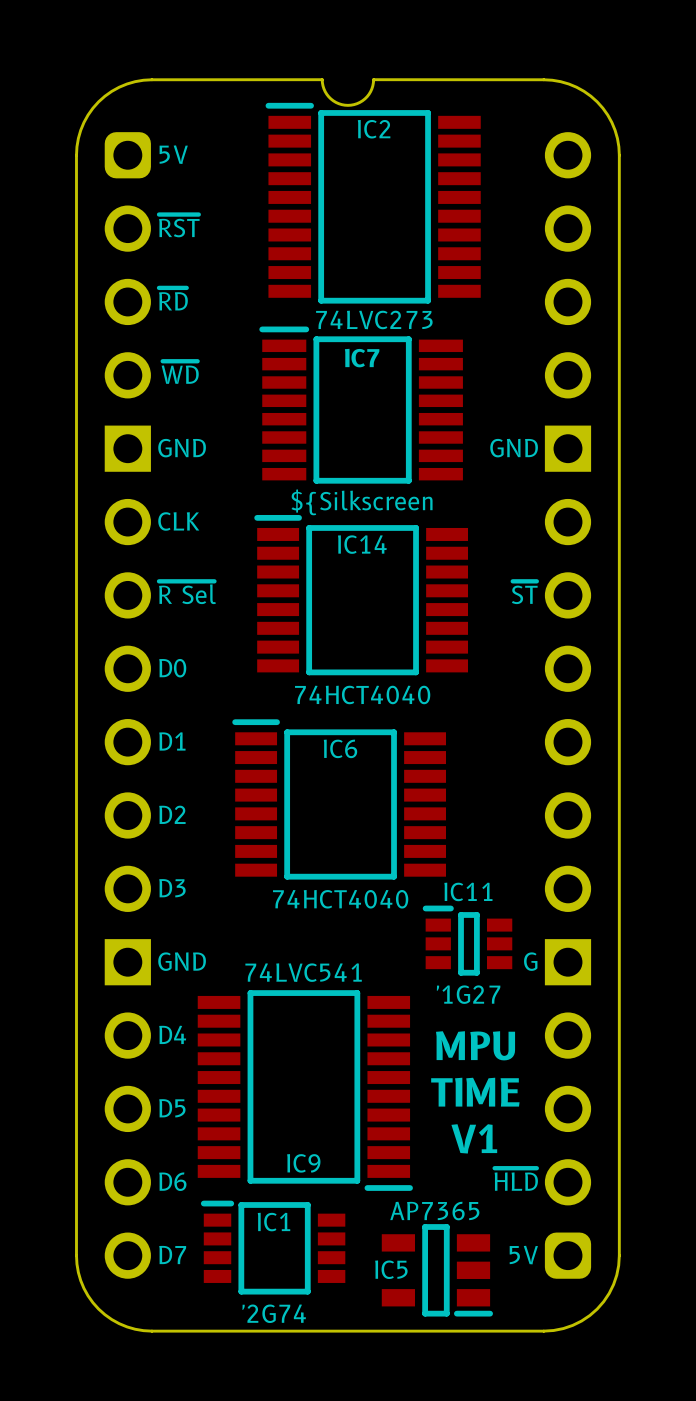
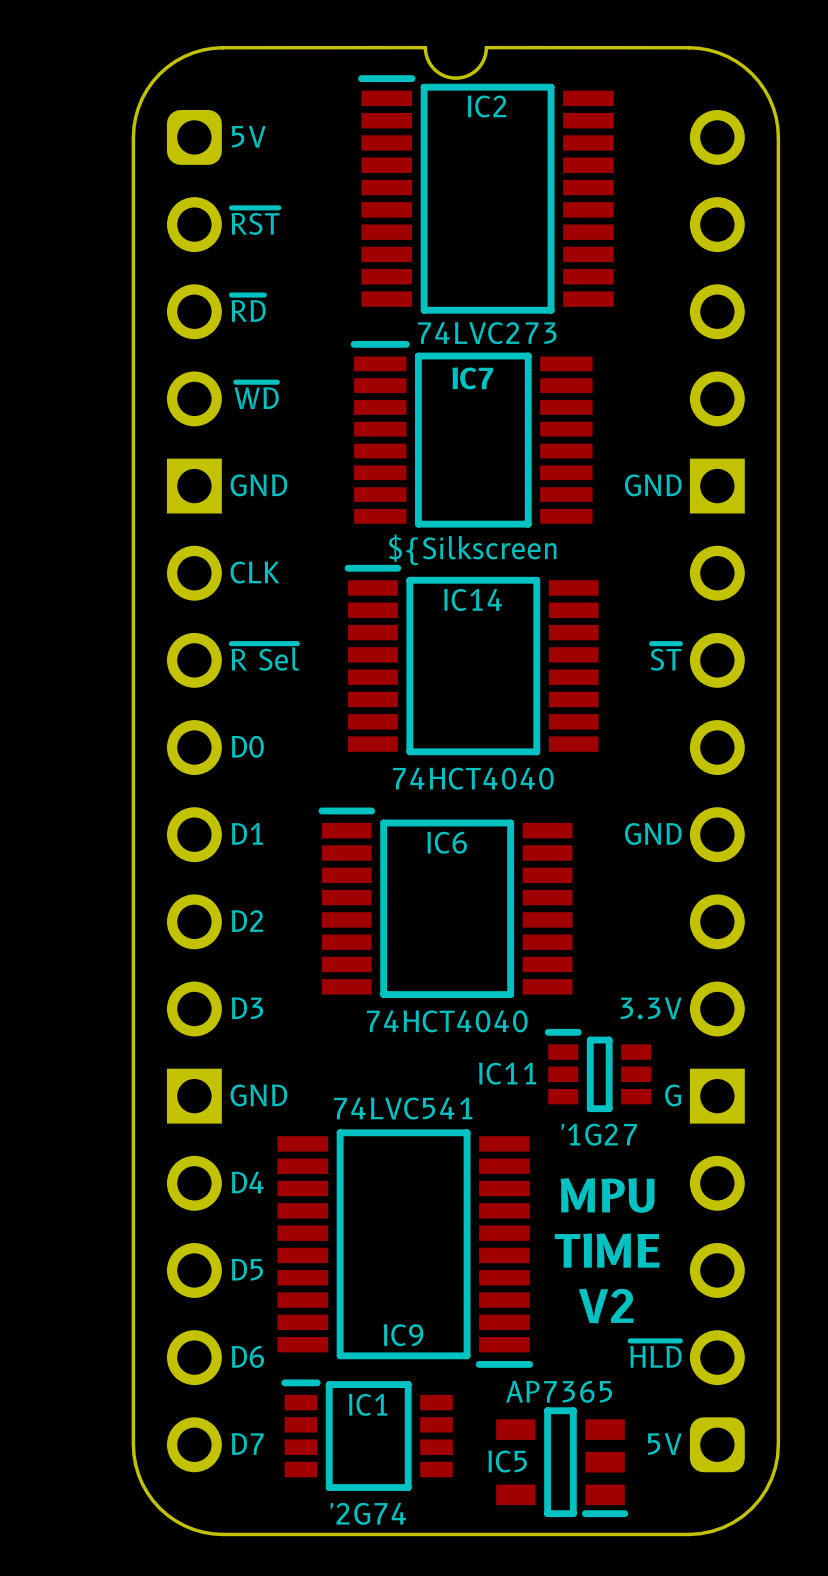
text: none -> GND (653, 833)
text: none -> 3.3V (651, 1008)
IC11 name position: IC11 (468, 891) -> IC11 (507, 1073)
text: V1 (474, 1138) -> V2 (606, 1306)

